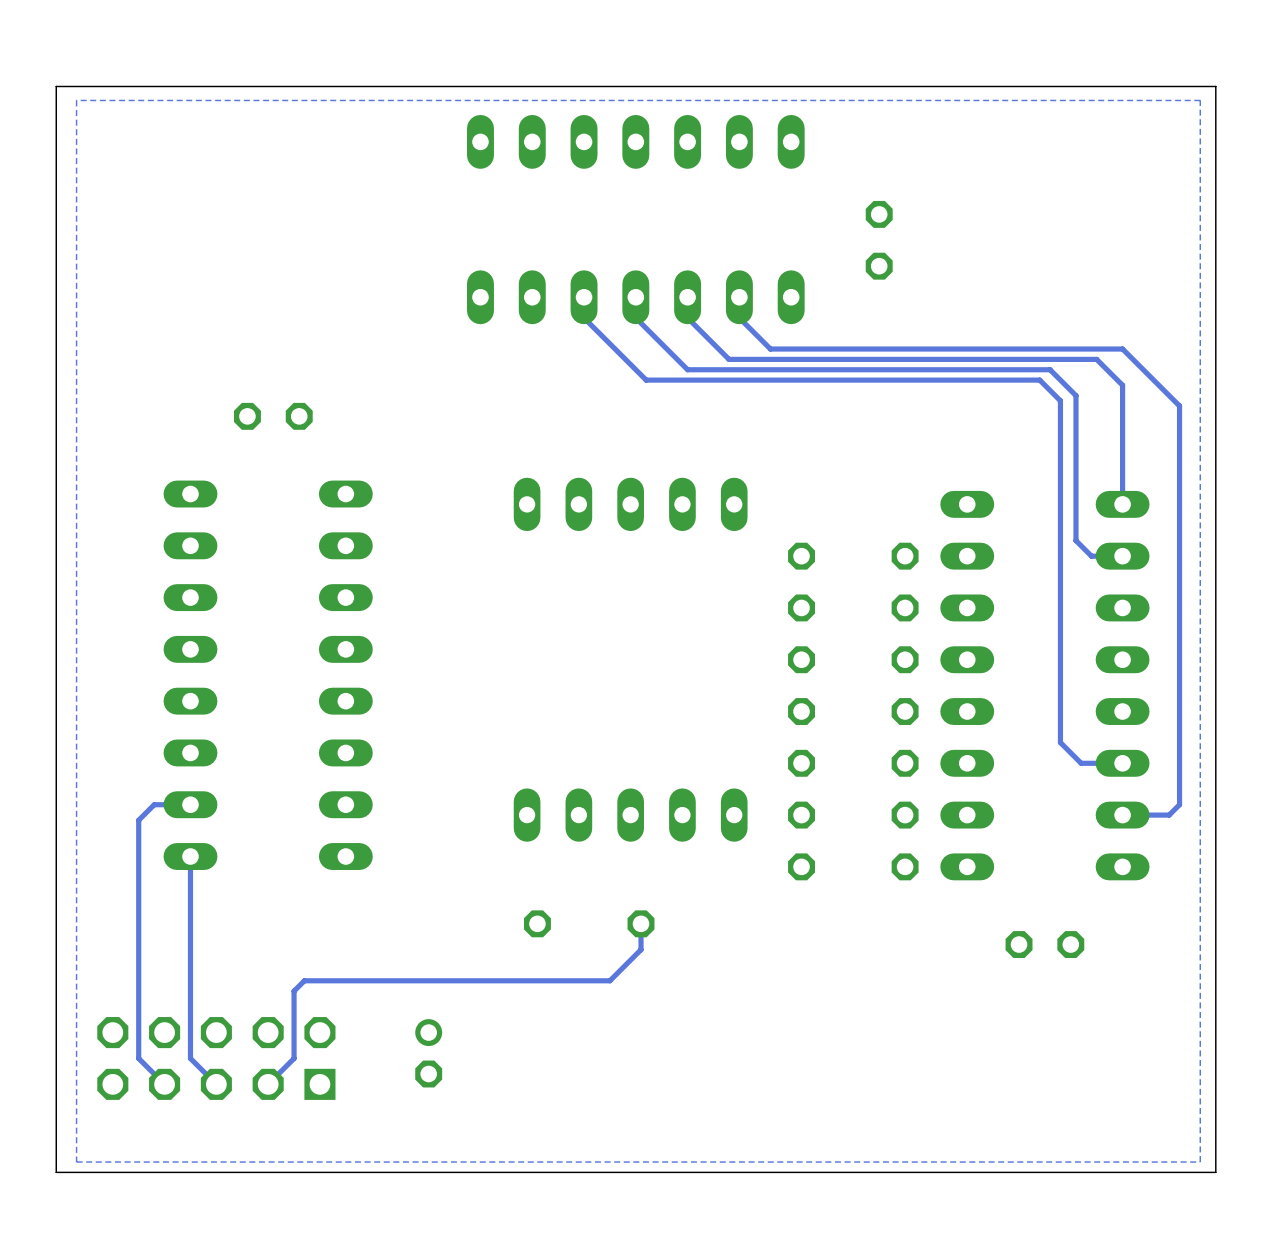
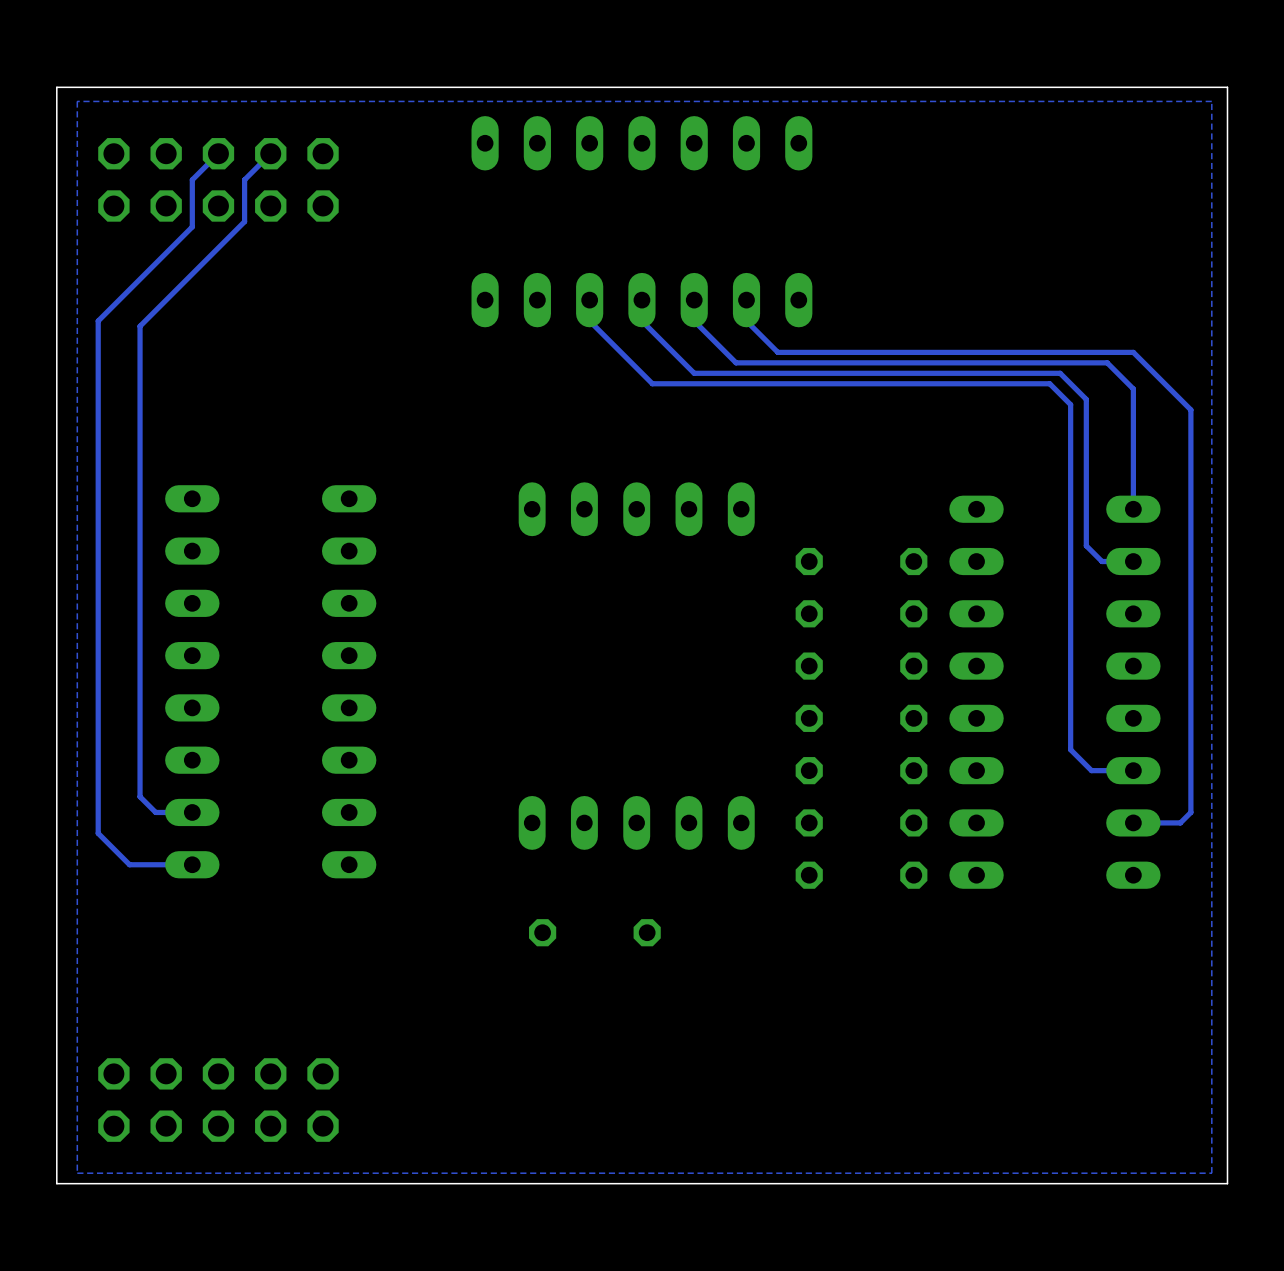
part: none -> (218, 179)
part: (879, 240) -> none
part: (273, 416) -> none
track: (154, 804) (138, 820) (138, 1058) (164, 1084) -> (155, 812) (140, 796) (140, 326) (244, 221) (244, 179) (270, 153)
track: (190, 856) (190, 1058) (216, 1084) -> (192, 864) (129, 864) (98, 833) (98, 321) (192, 226) (192, 179) (218, 153)
track: (641, 923) (641, 949) (609, 980) (304, 980) (294, 991) (294, 1058) (268, 1084) -> none
part: (1044, 944) -> none
part: (428, 1053) -> none
part: (216, 1058) -> none
part: none -> (218, 1100)

